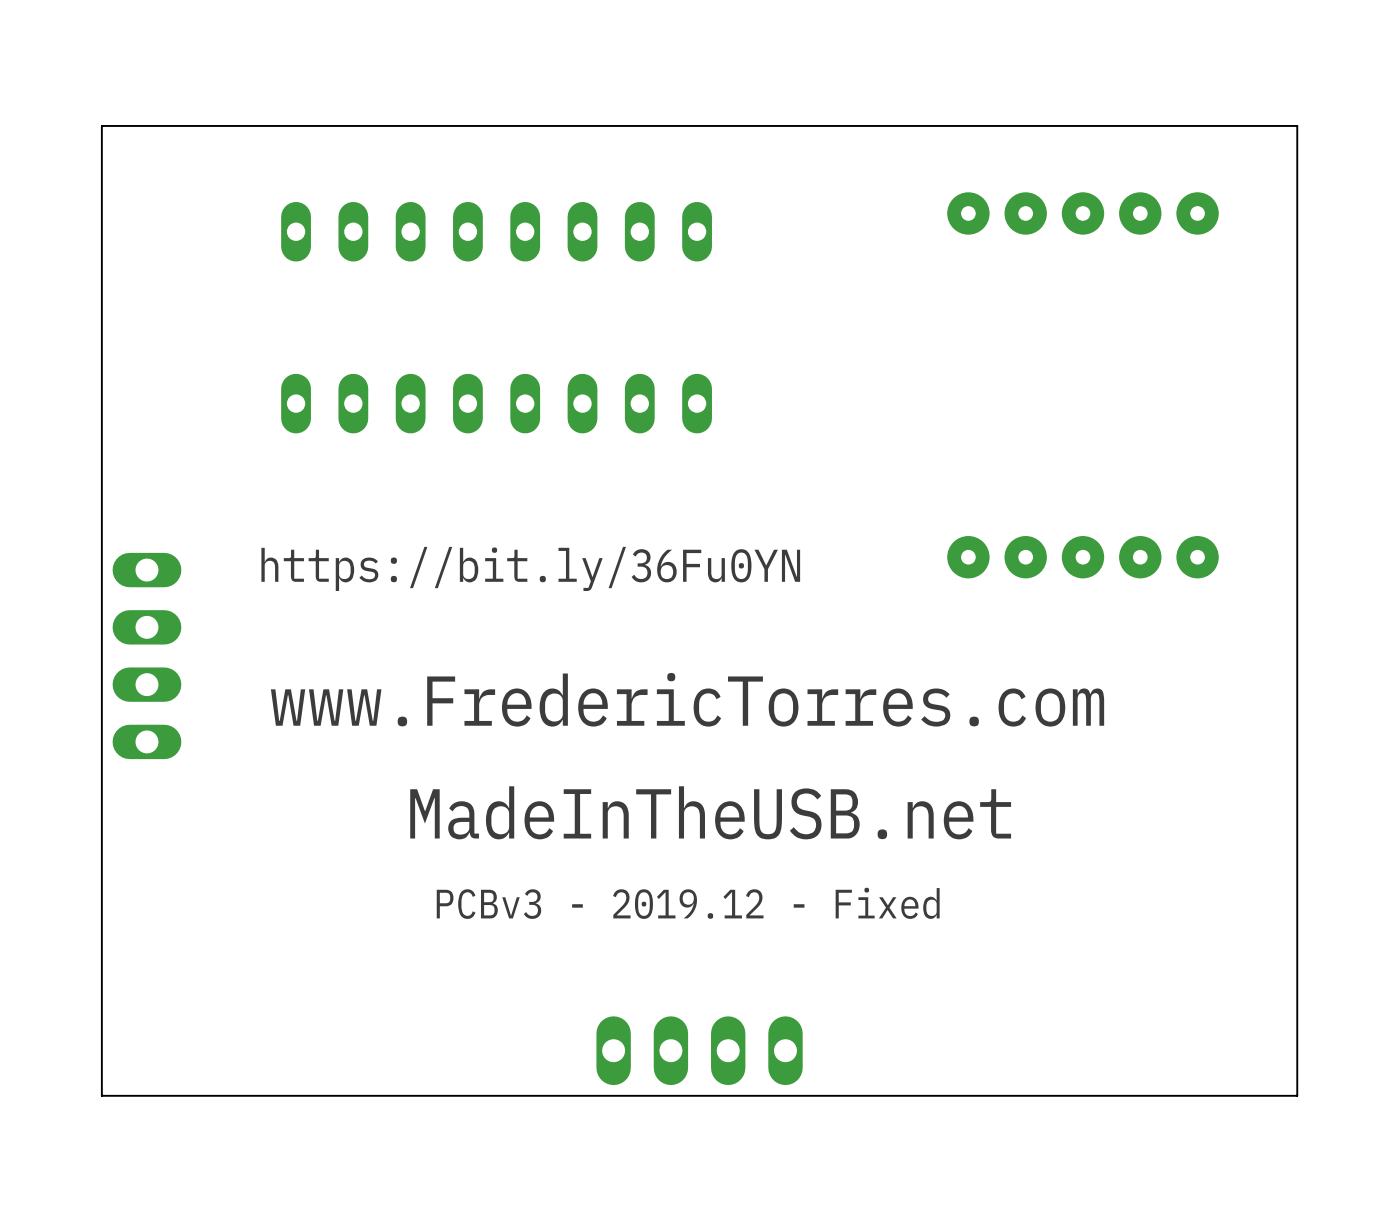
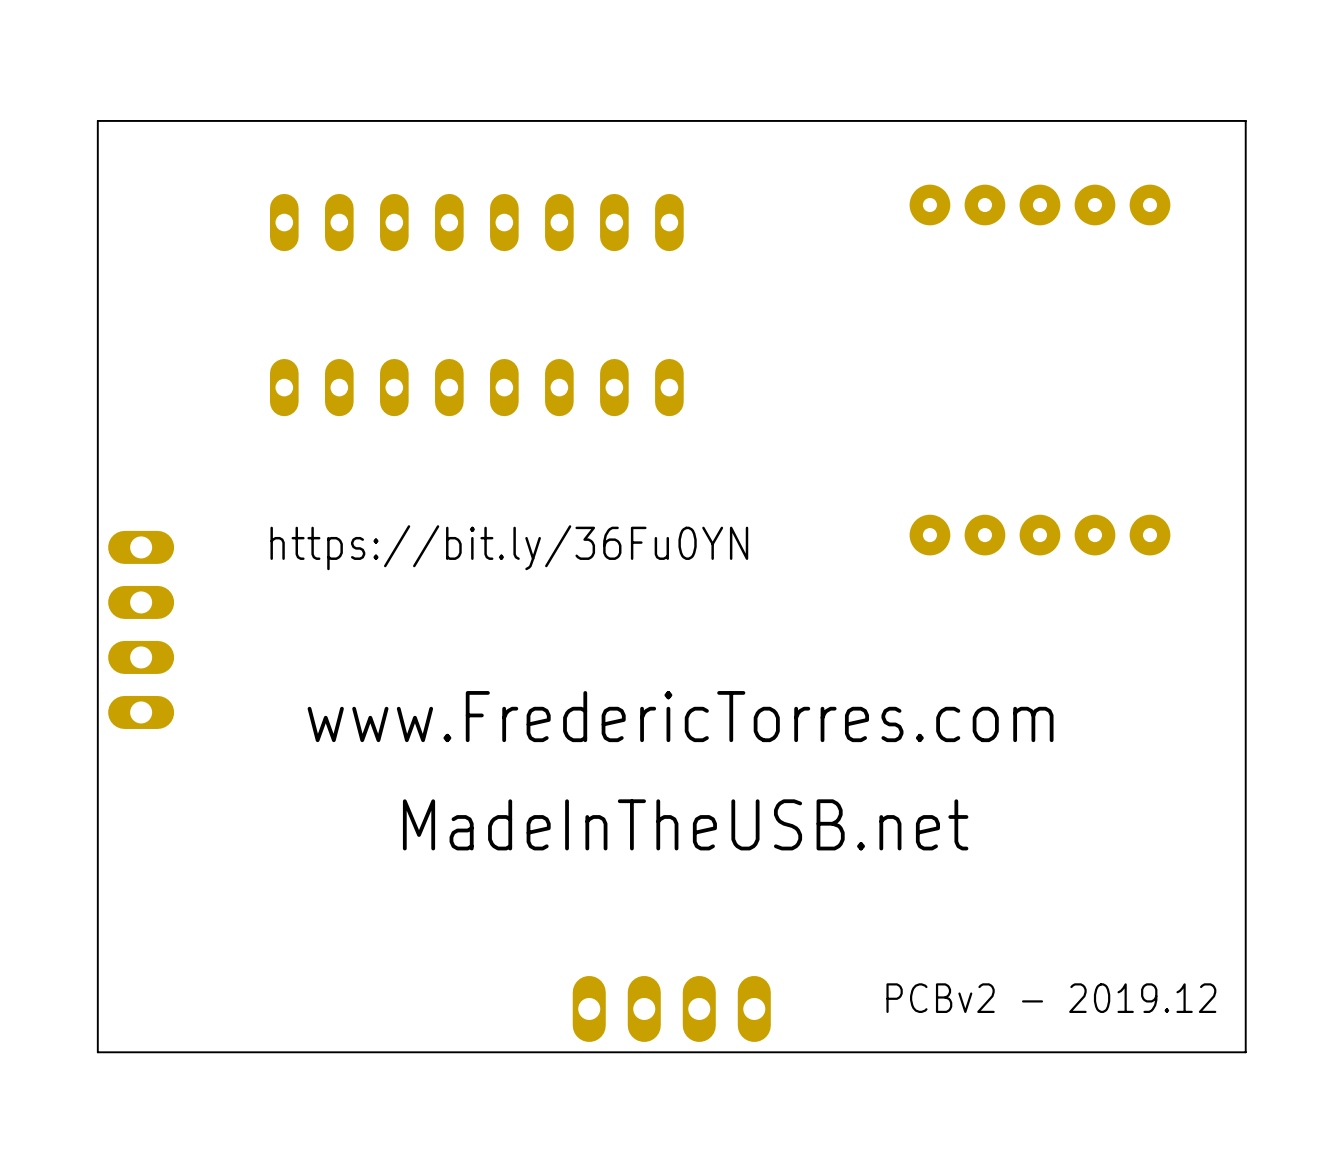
text position: www.FredericTorres.com (687, 699) -> www.FredericTorres.com (680, 716)
text position: MadeInTheUSB.net (710, 812) -> MadeInTheUSB.net (685, 824)
text: PCBv3 - 2019.12 - Fixed (688, 903) -> none
text: none -> PCBv2 - 2019.12 (1051, 998)

